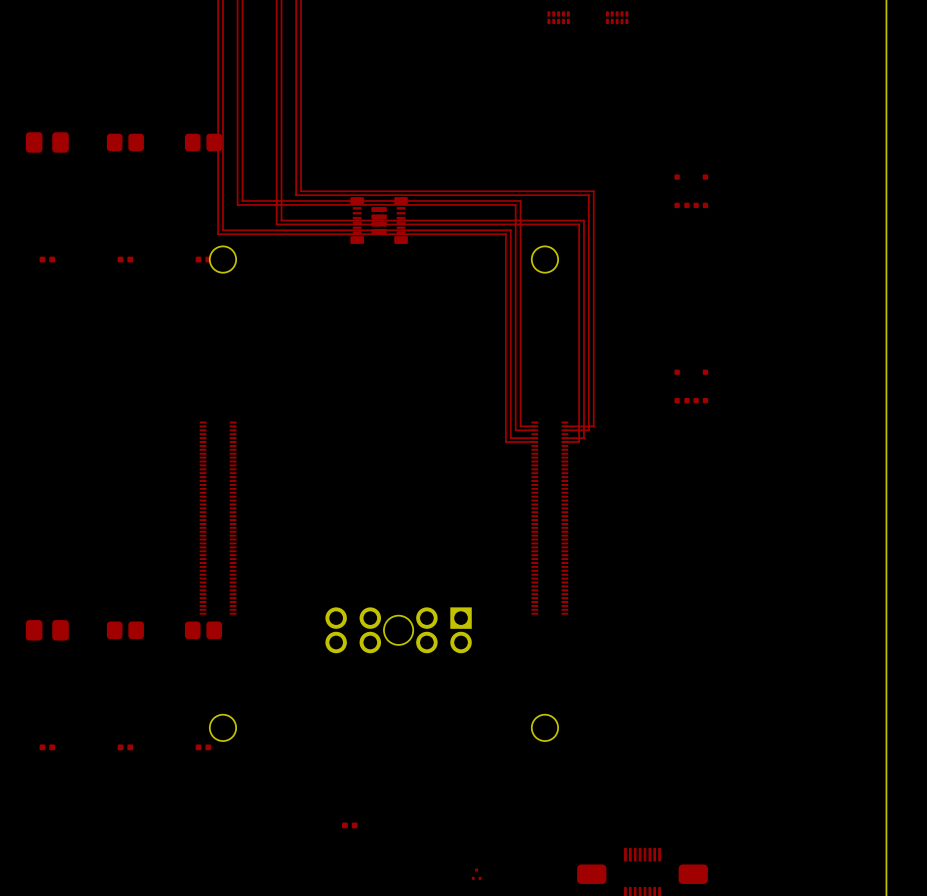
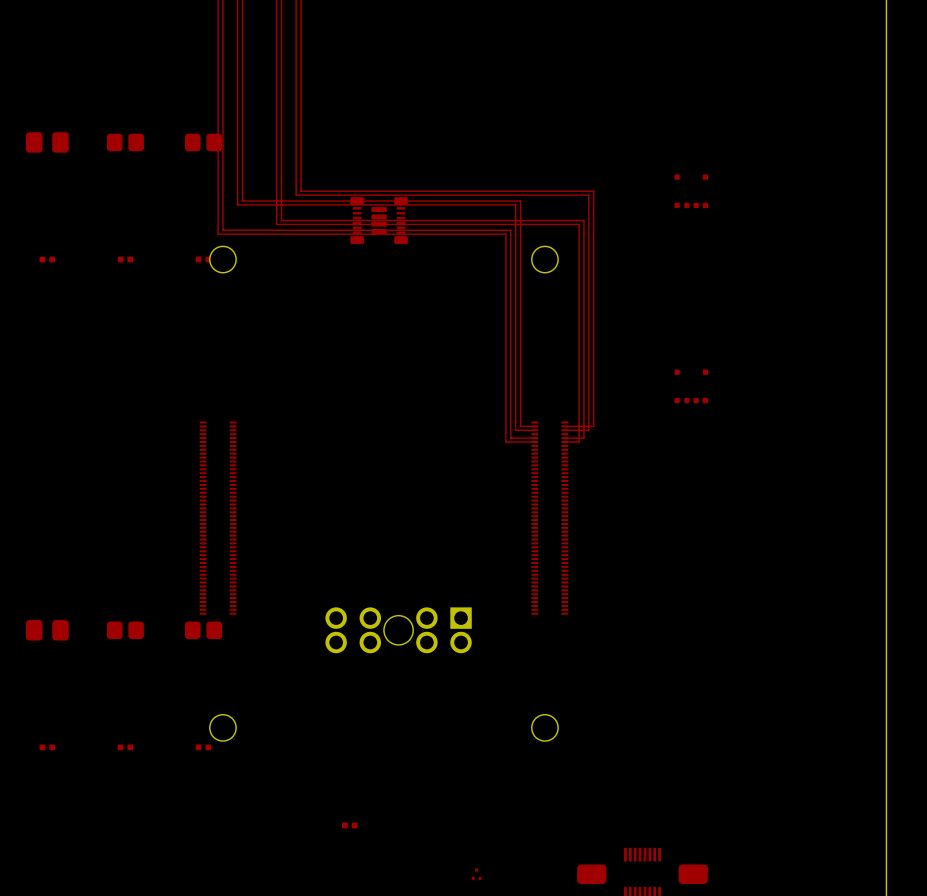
part: (558, 17) -> none
part: (617, 17) -> none

